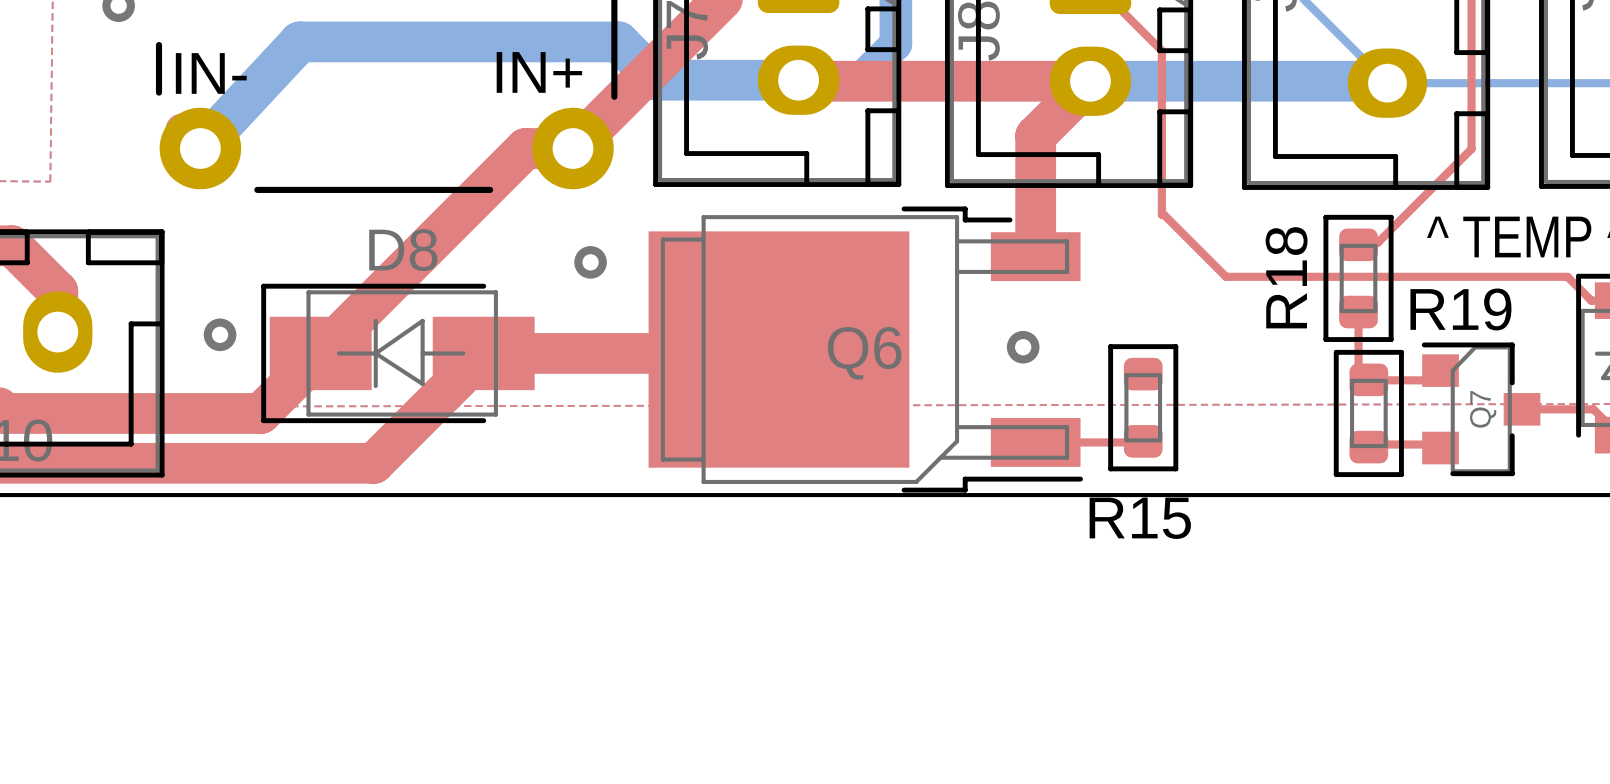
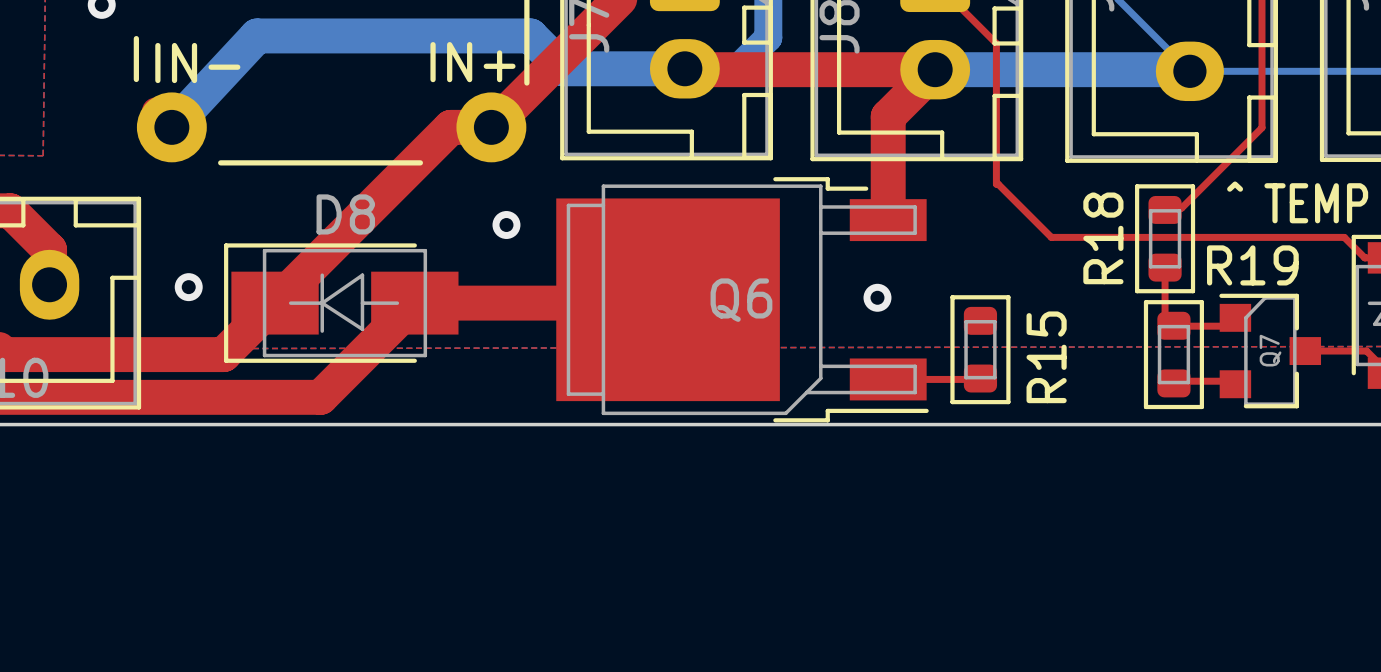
R15 name rotation: 0° (1140, 518) -> 90° counterclockwise (1046, 357)

